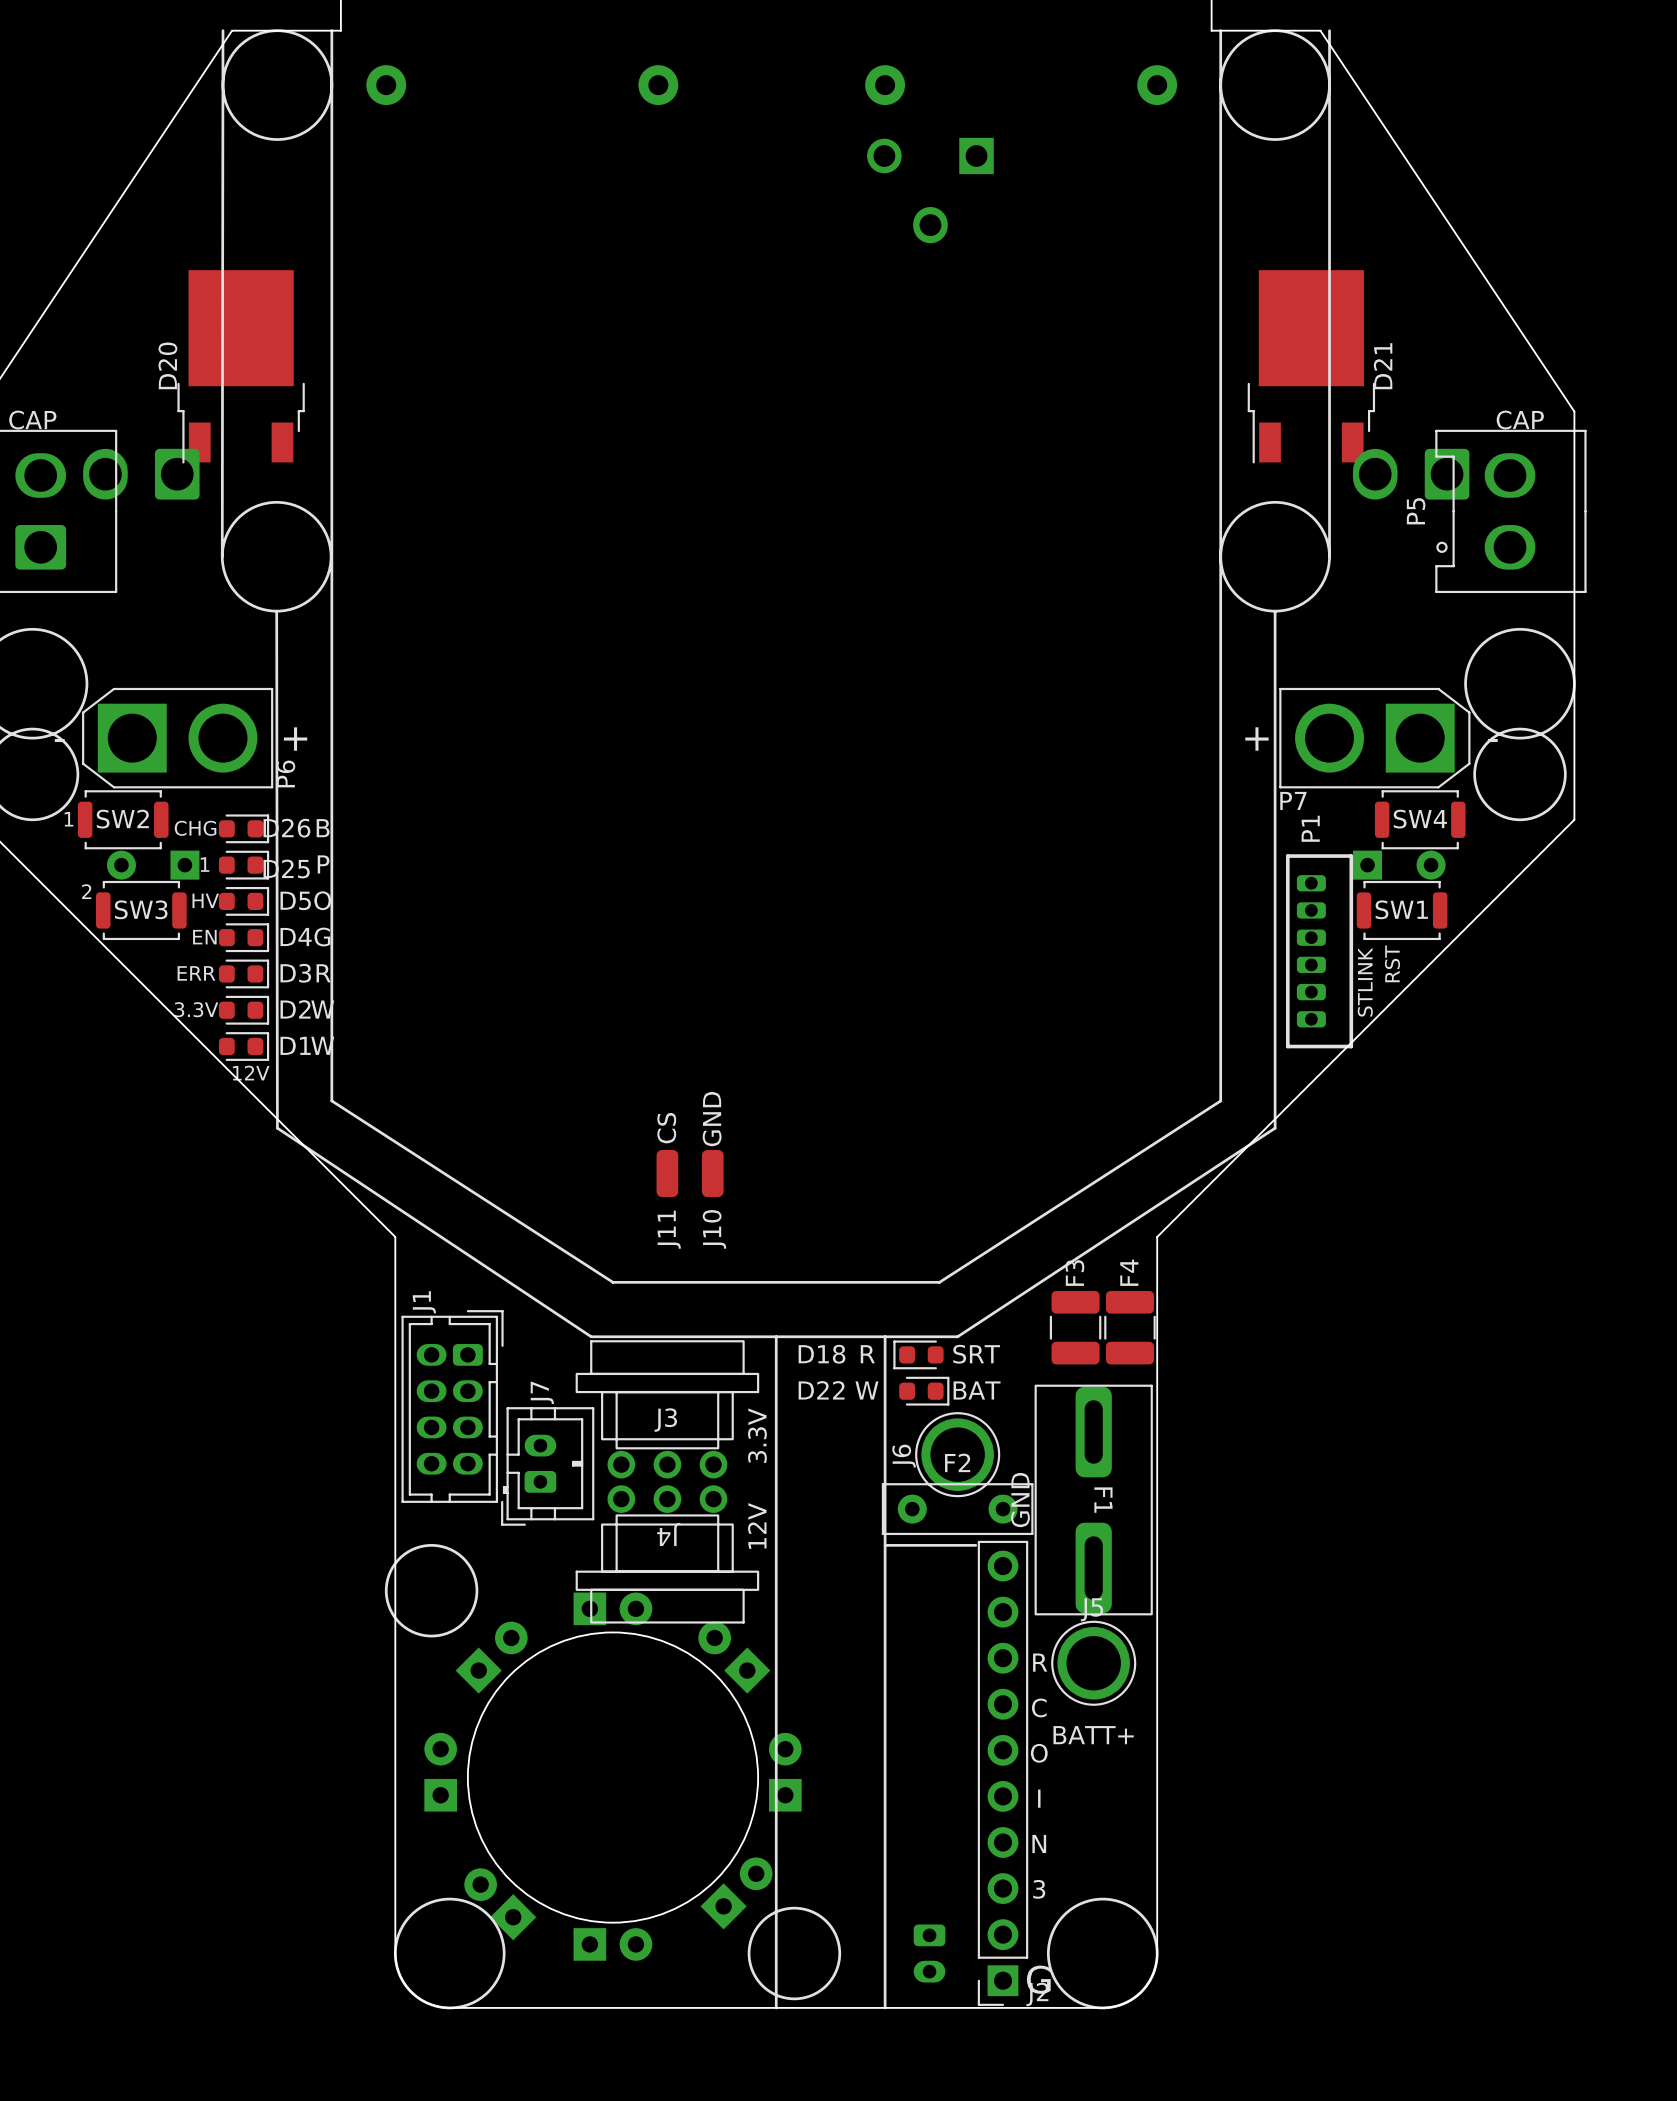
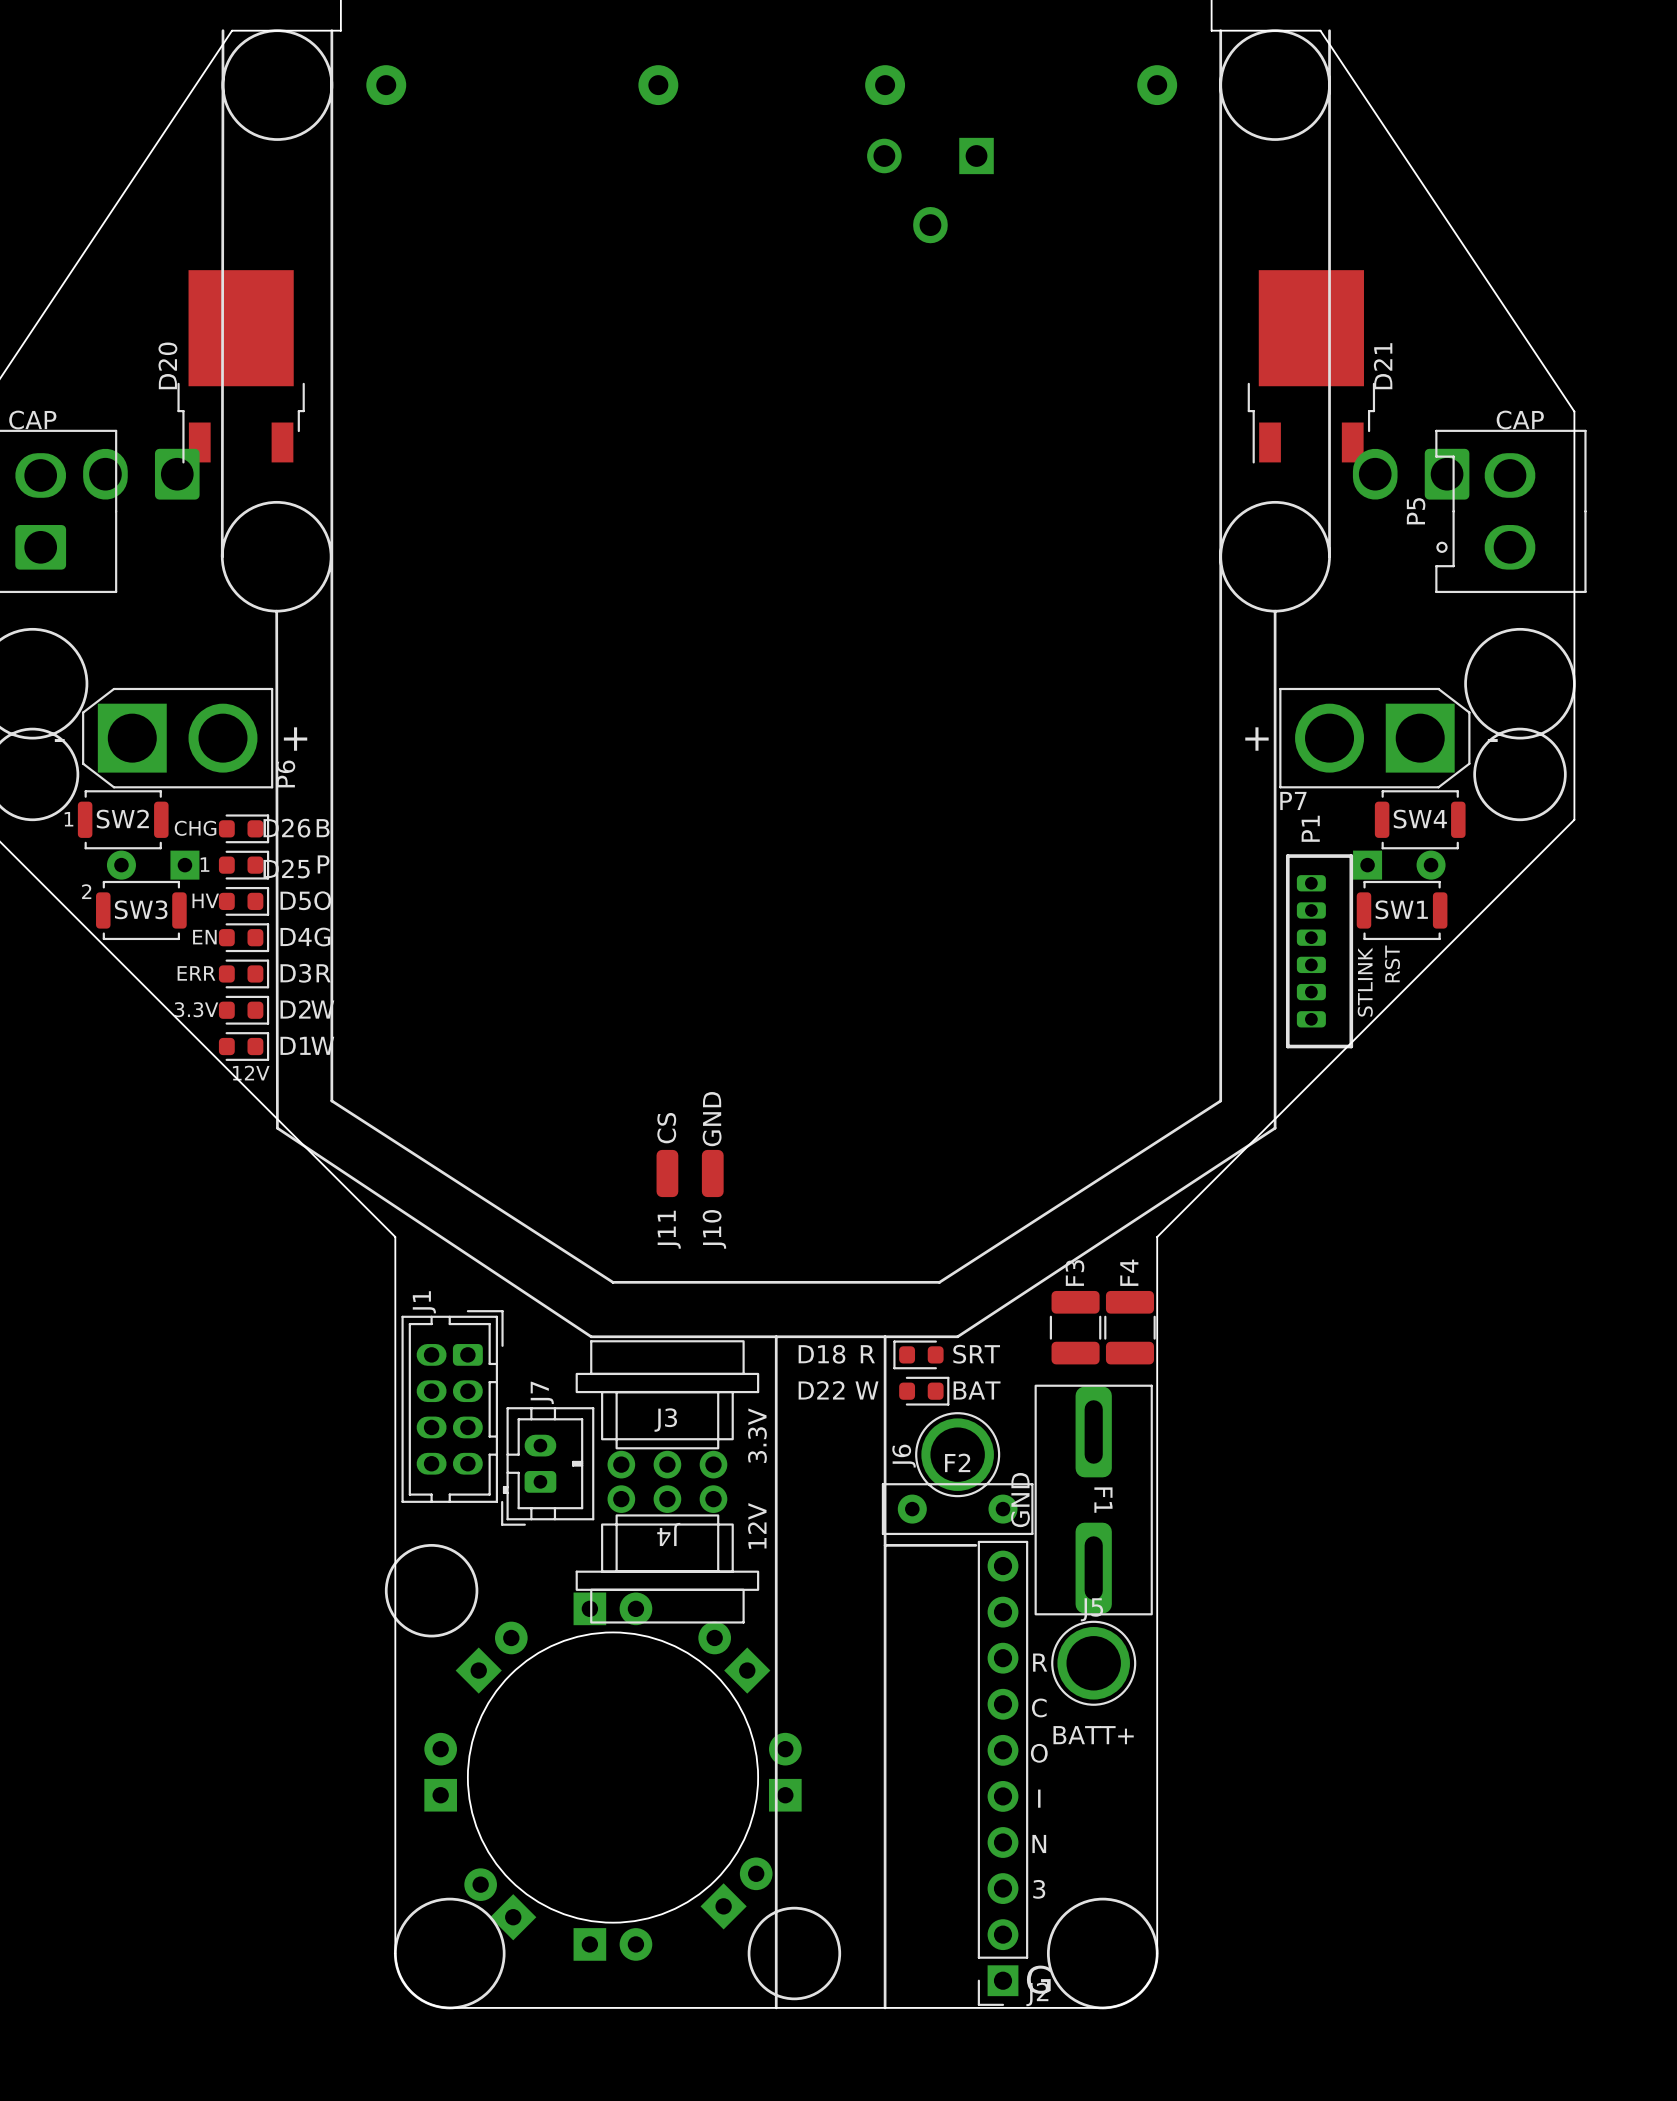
part: (929, 1953) -> none

